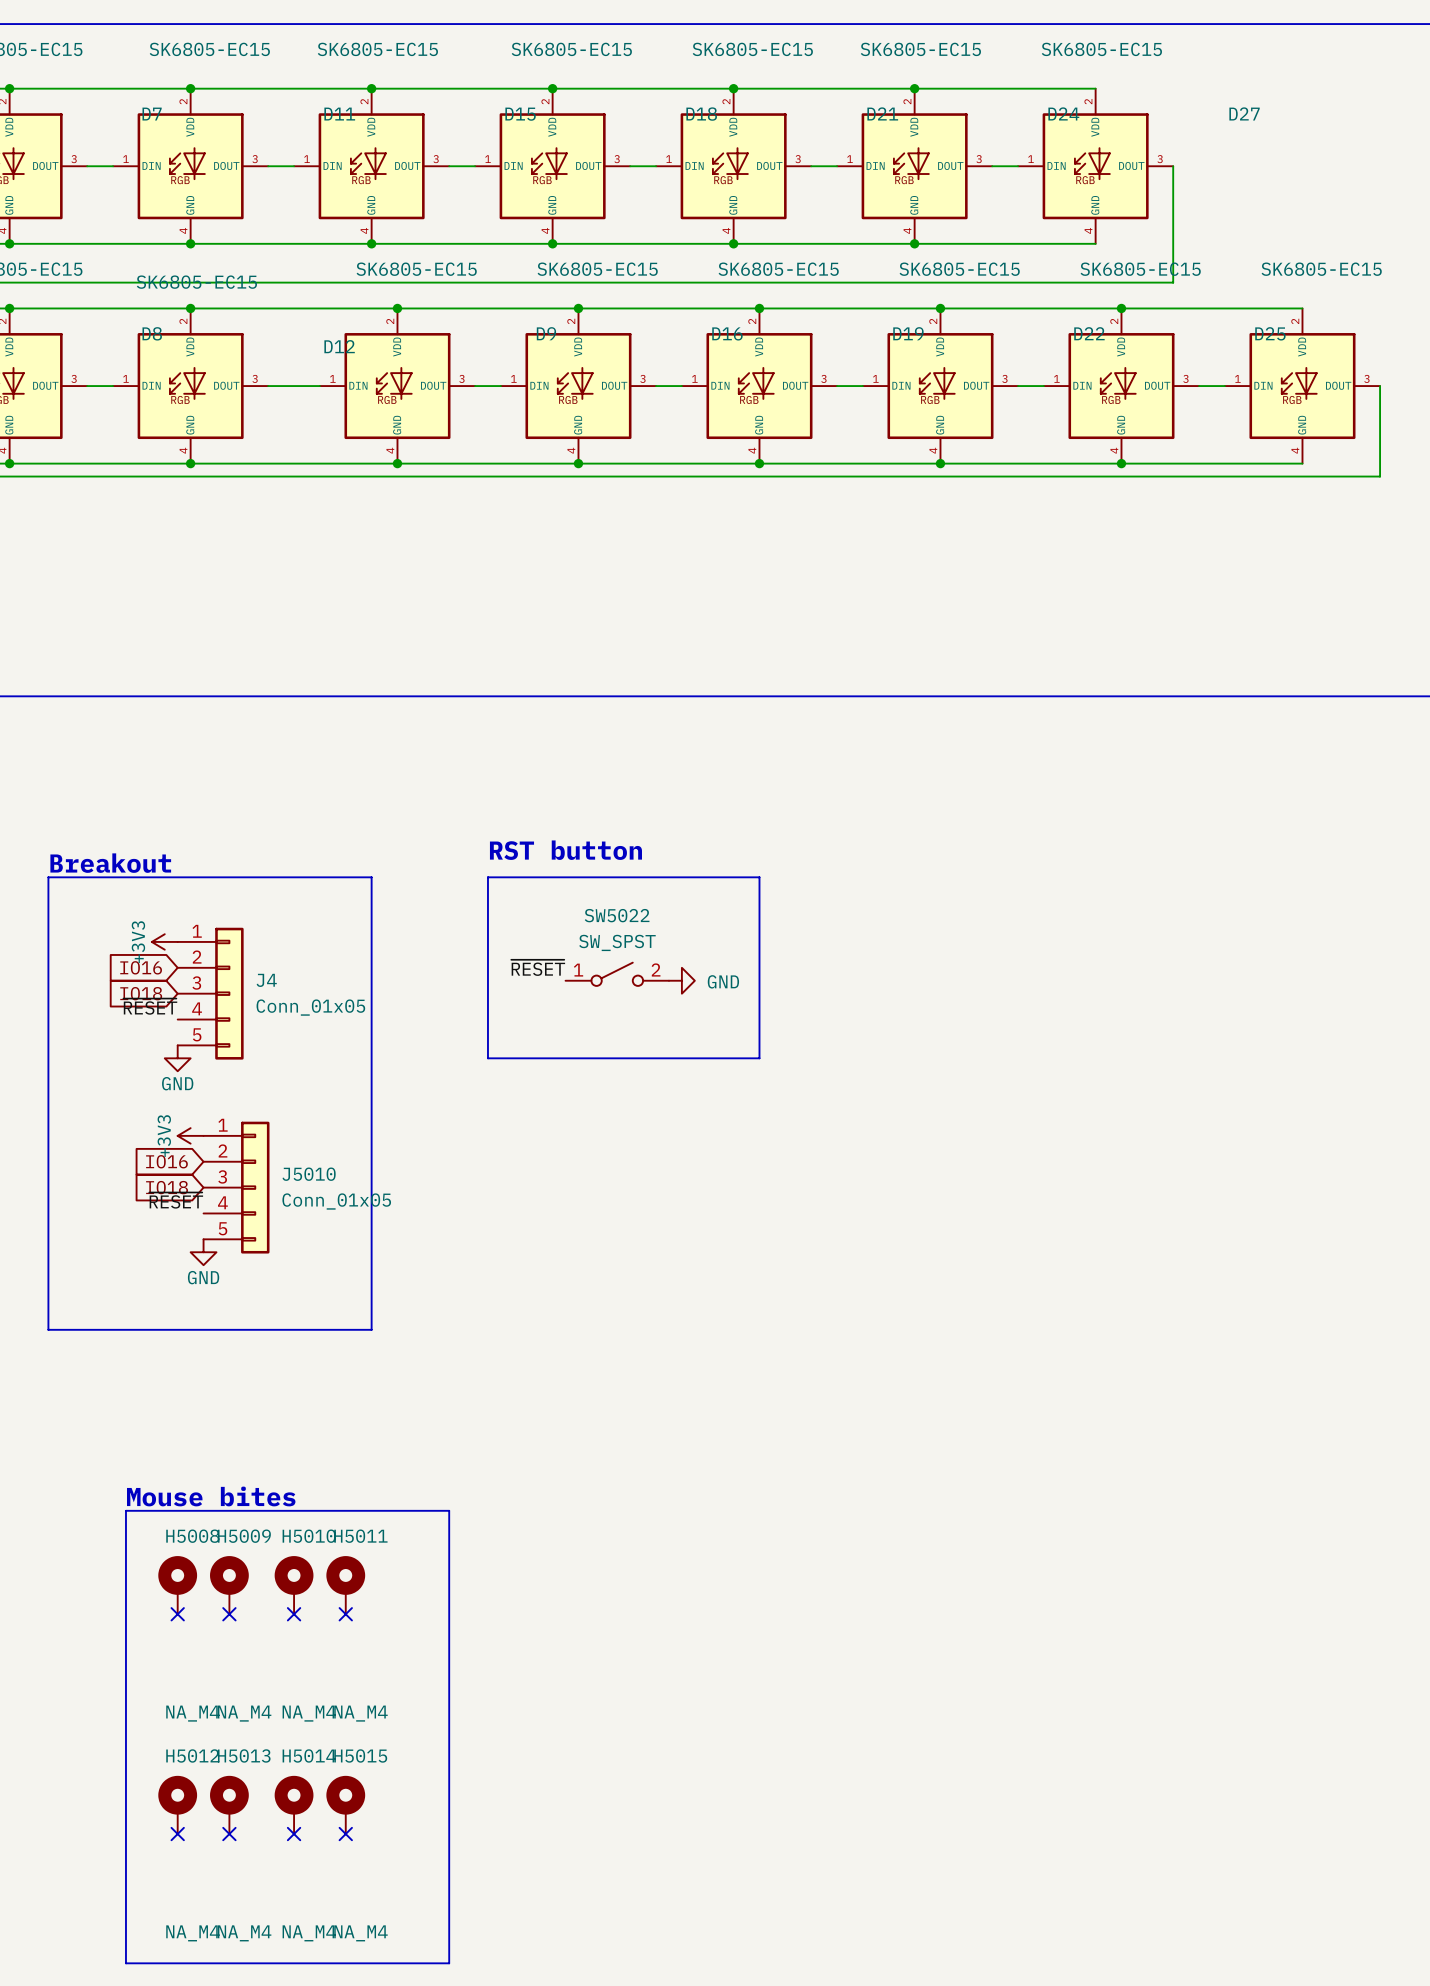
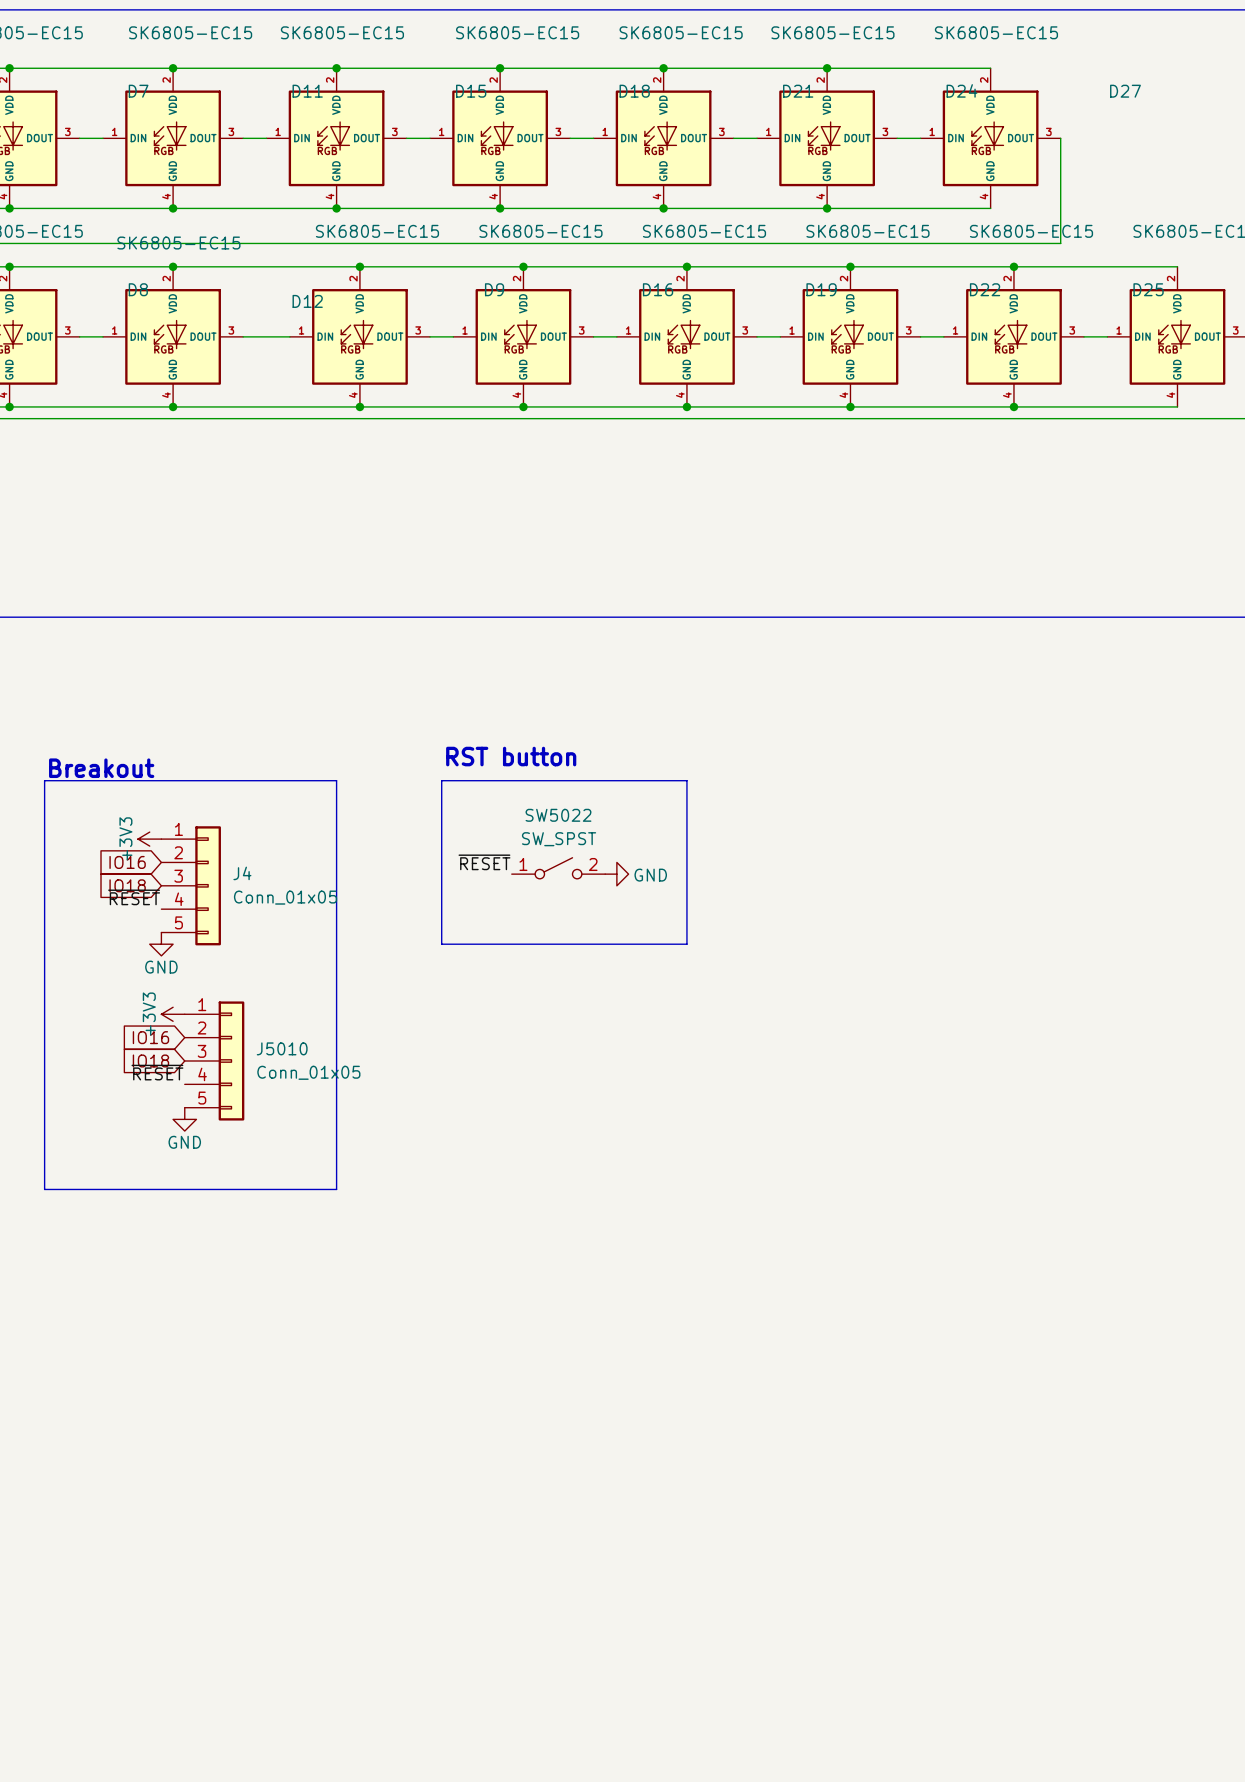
text: Mouse bites (211, 1496) -> none
line: (125, 1510) (449, 1510) (449, 1963) (125, 1963) (125, 1510) -> none
H5008: NA_M4 (177, 1585) -> none
H5009: NA_M4 (229, 1585) -> none
H5010: NA_M4 (294, 1585) -> none
H5011: NA_M4 (345, 1585) -> none
no-connect mark: (177, 1614) -> none
no-connect mark: (229, 1614) -> none
no-connect mark: (294, 1614) -> none
no-connect mark: (345, 1614) -> none
H5012: NA_M4 (177, 1804) -> none
H5013: NA_M4 (229, 1804) -> none
H5014: NA_M4 (294, 1804) -> none
H5015: NA_M4 (345, 1804) -> none
no-connect mark: (177, 1834) -> none
no-connect mark: (229, 1834) -> none
no-connect mark: (294, 1834) -> none
no-connect mark: (345, 1834) -> none

